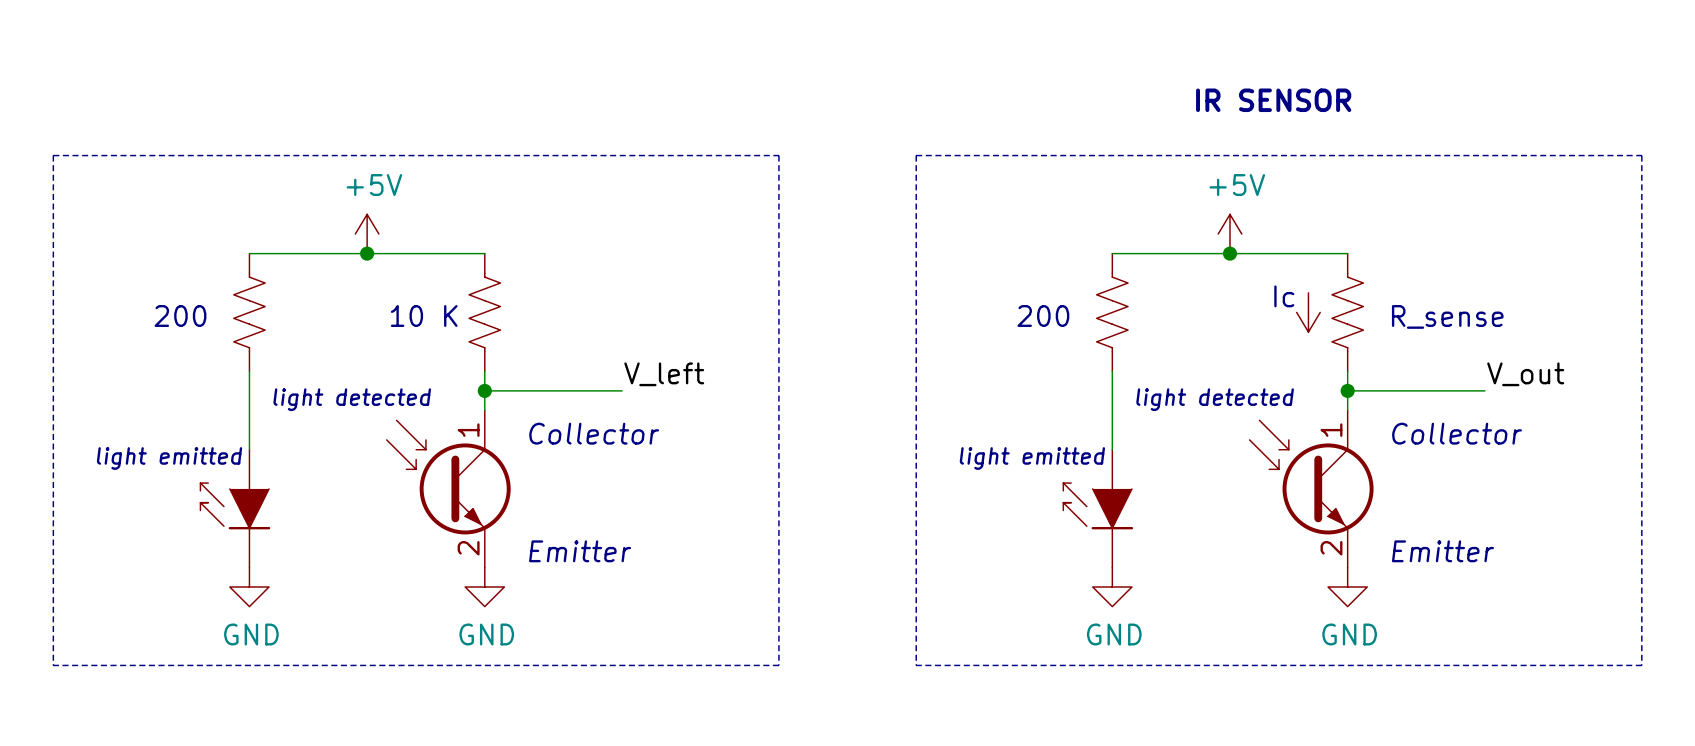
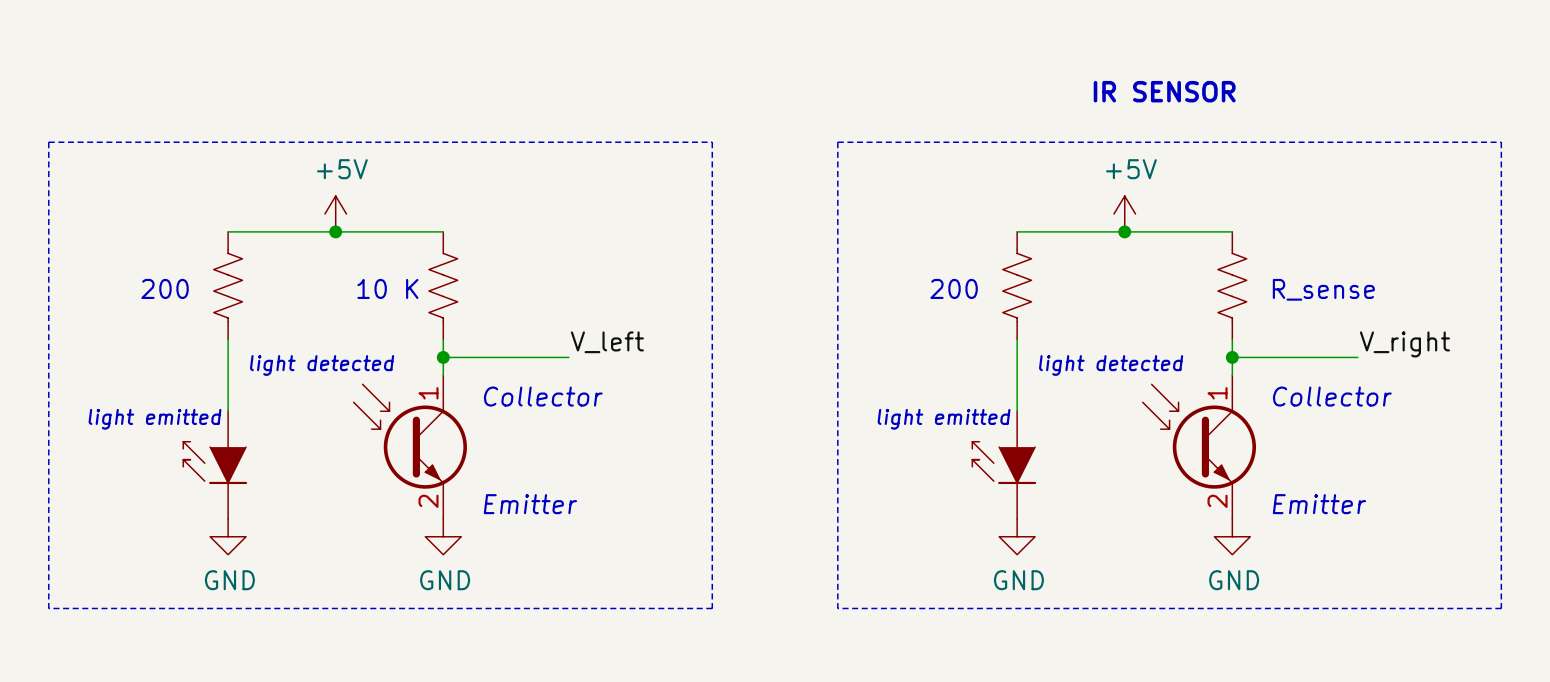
text: Ic (1284, 296) -> none
power symbol: (1308, 312) -> none
label: V_out (1525, 374) -> V_right (1404, 344)

